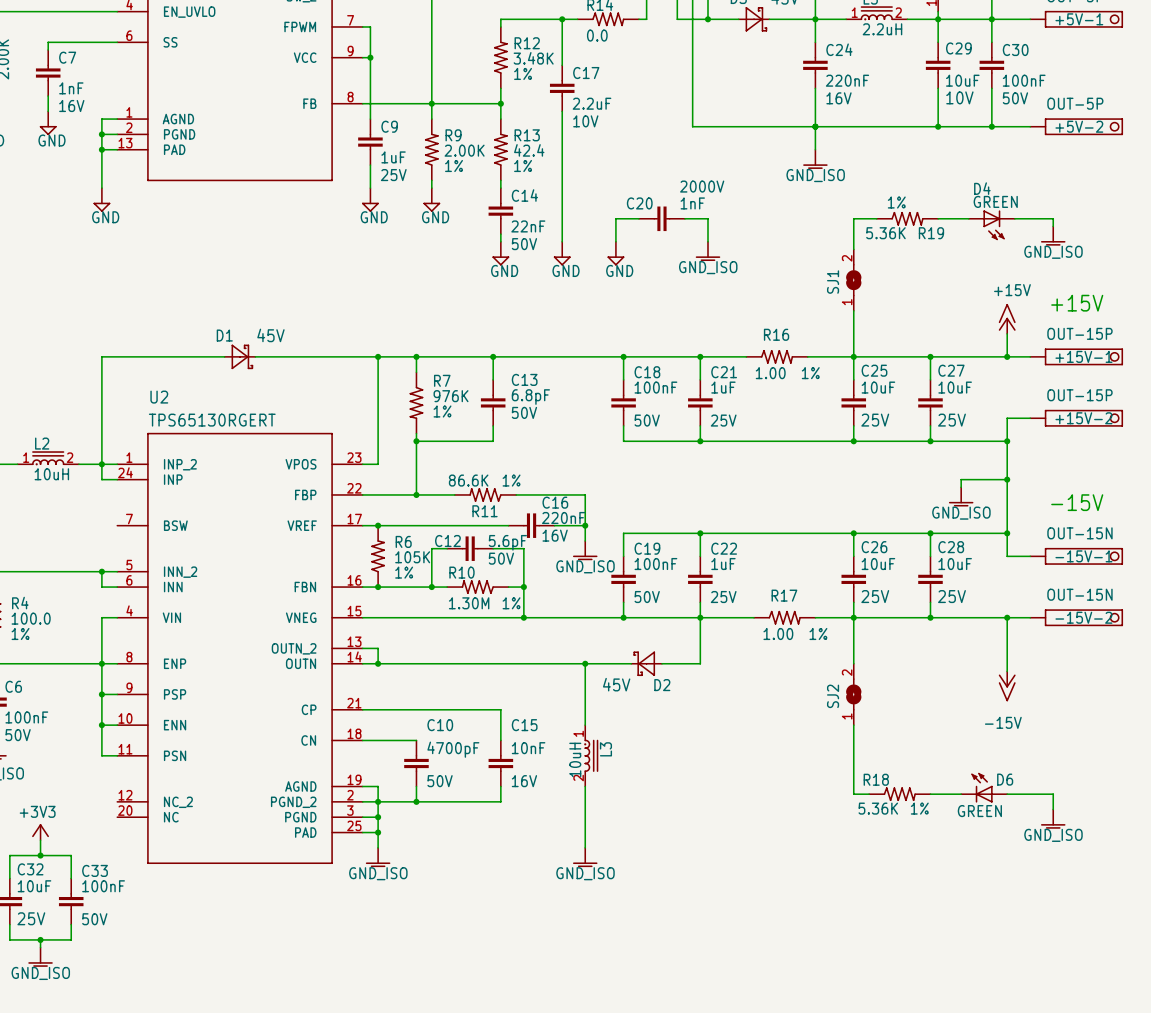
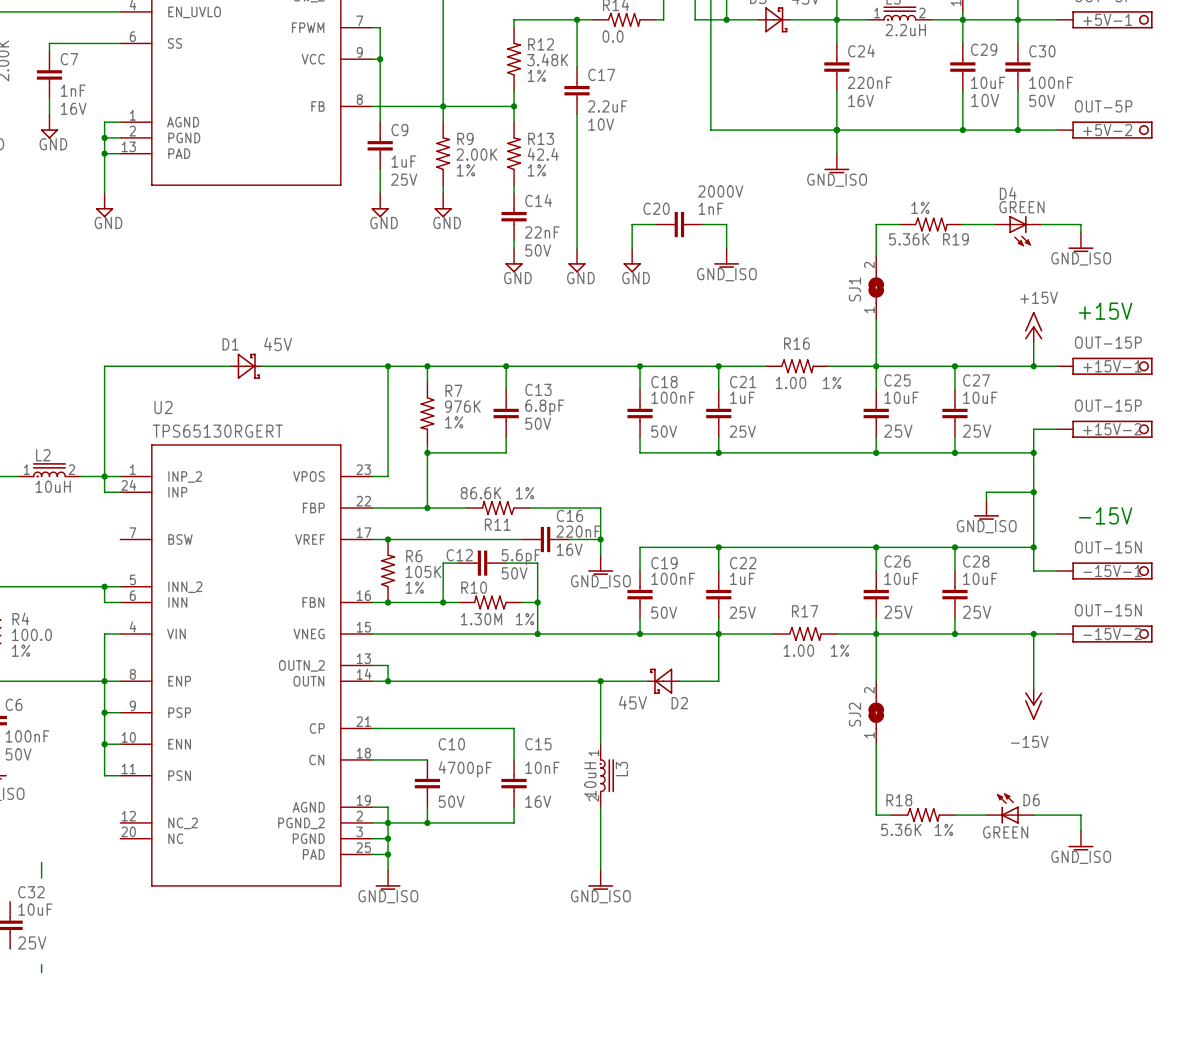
power symbol: +3V3 (40, 832) -> none
junction: (40, 855) -> none
wire: (9, 878) (9, 855) (71, 855) (71, 878) -> none
C33: 100nF (71, 901) -> none
wire: (9, 924) (9, 939) (71, 939) (71, 924) -> none
junction: (40, 939) -> none
power symbol: GND_ISO (40, 957) -> none

